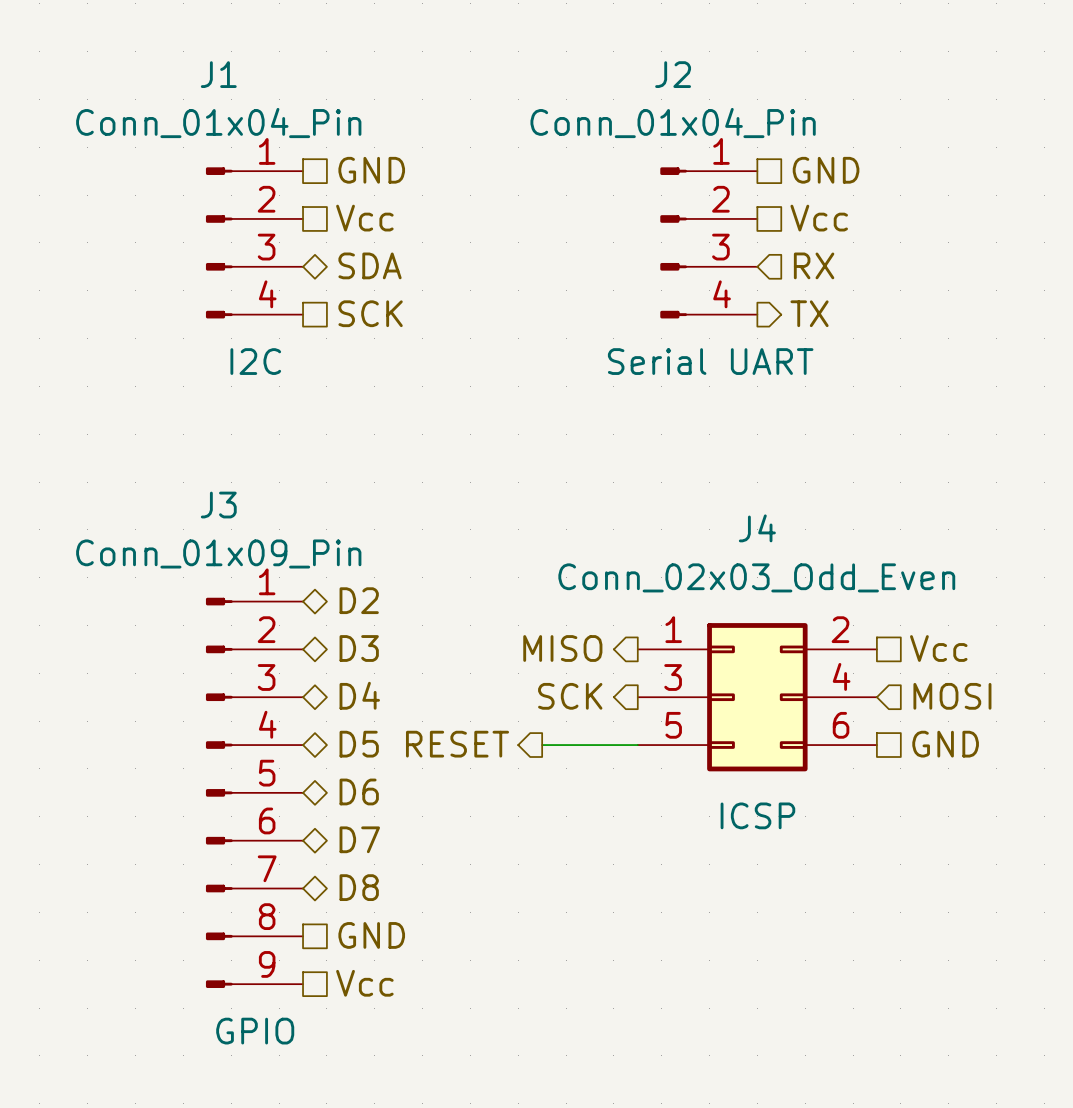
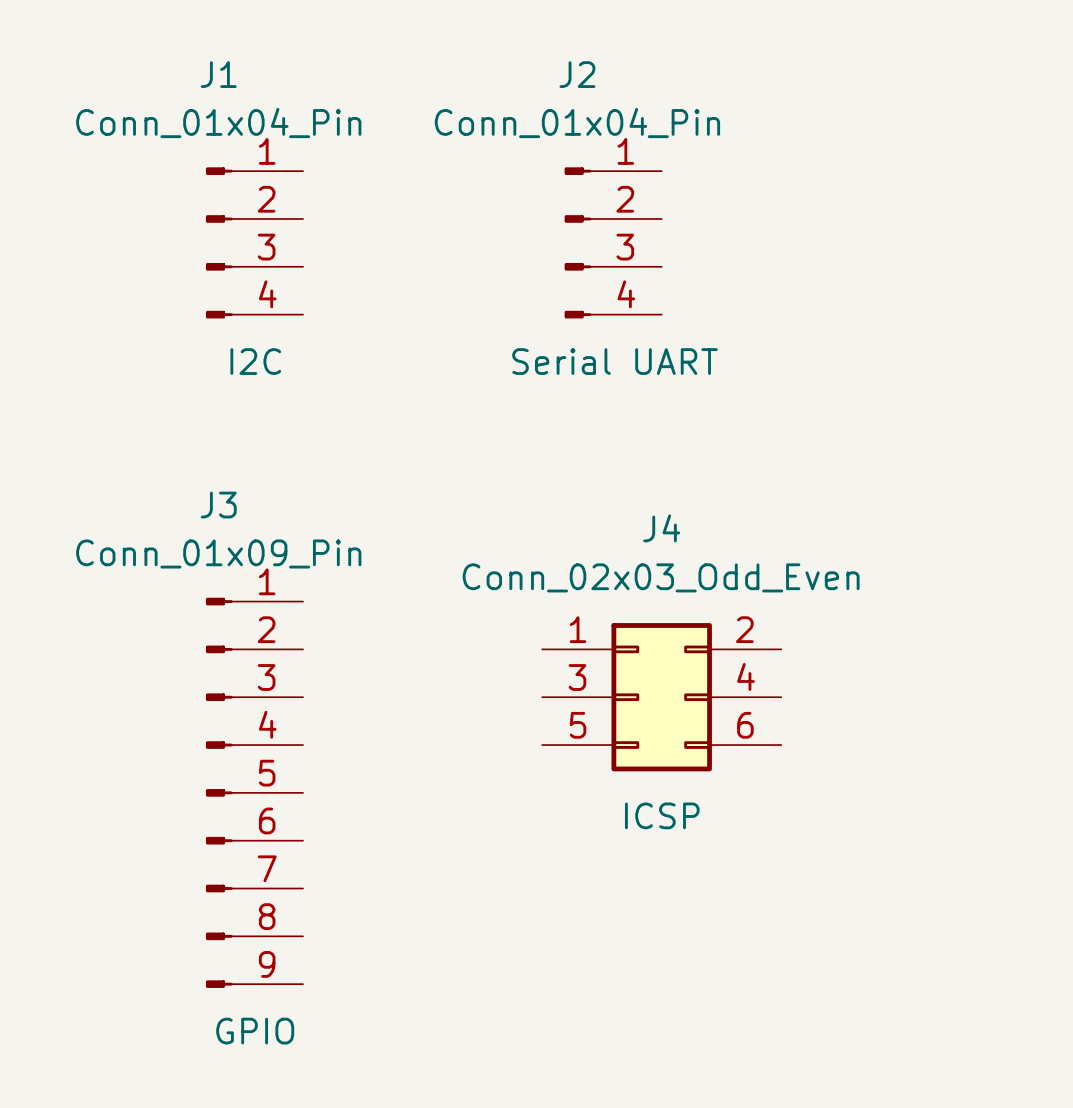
hierarchical label: GND (371, 170) -> none
hierarchical label: GND (826, 170) -> none
hierarchical label: Vcc (364, 218) -> none
hierarchical label: Vcc (819, 218) -> none
J2 position: (708, 242) -> (613, 242)
hierarchical label: SDA (370, 265) -> none
hierarchical label: RX (814, 265) -> none
hierarchical label: SCK (370, 313) -> none
hierarchical label: TX (809, 313) -> none
hierarchical label: D2 (359, 600) -> none
hierarchical label: D3 (359, 648) -> none
hierarchical label: MISO (562, 648) -> none
hierarchical label: Vcc (938, 648) -> none
hierarchical label: D4 (359, 695) -> none
hierarchical label: SCK (570, 696) -> none
hierarchical label: MOSI (952, 696) -> none
J4 position: (757, 697) -> (661, 697)
hierarchical label: D5 (359, 744) -> none
hierarchical label: RESET (457, 744) -> none
hierarchical label: GND (945, 744) -> none
hierarchical label: D6 (359, 791) -> none
hierarchical label: D7 (359, 839) -> none
hierarchical label: D8 (359, 887) -> none
hierarchical label: GND (371, 935) -> none
hierarchical label: Vcc (364, 983) -> none

